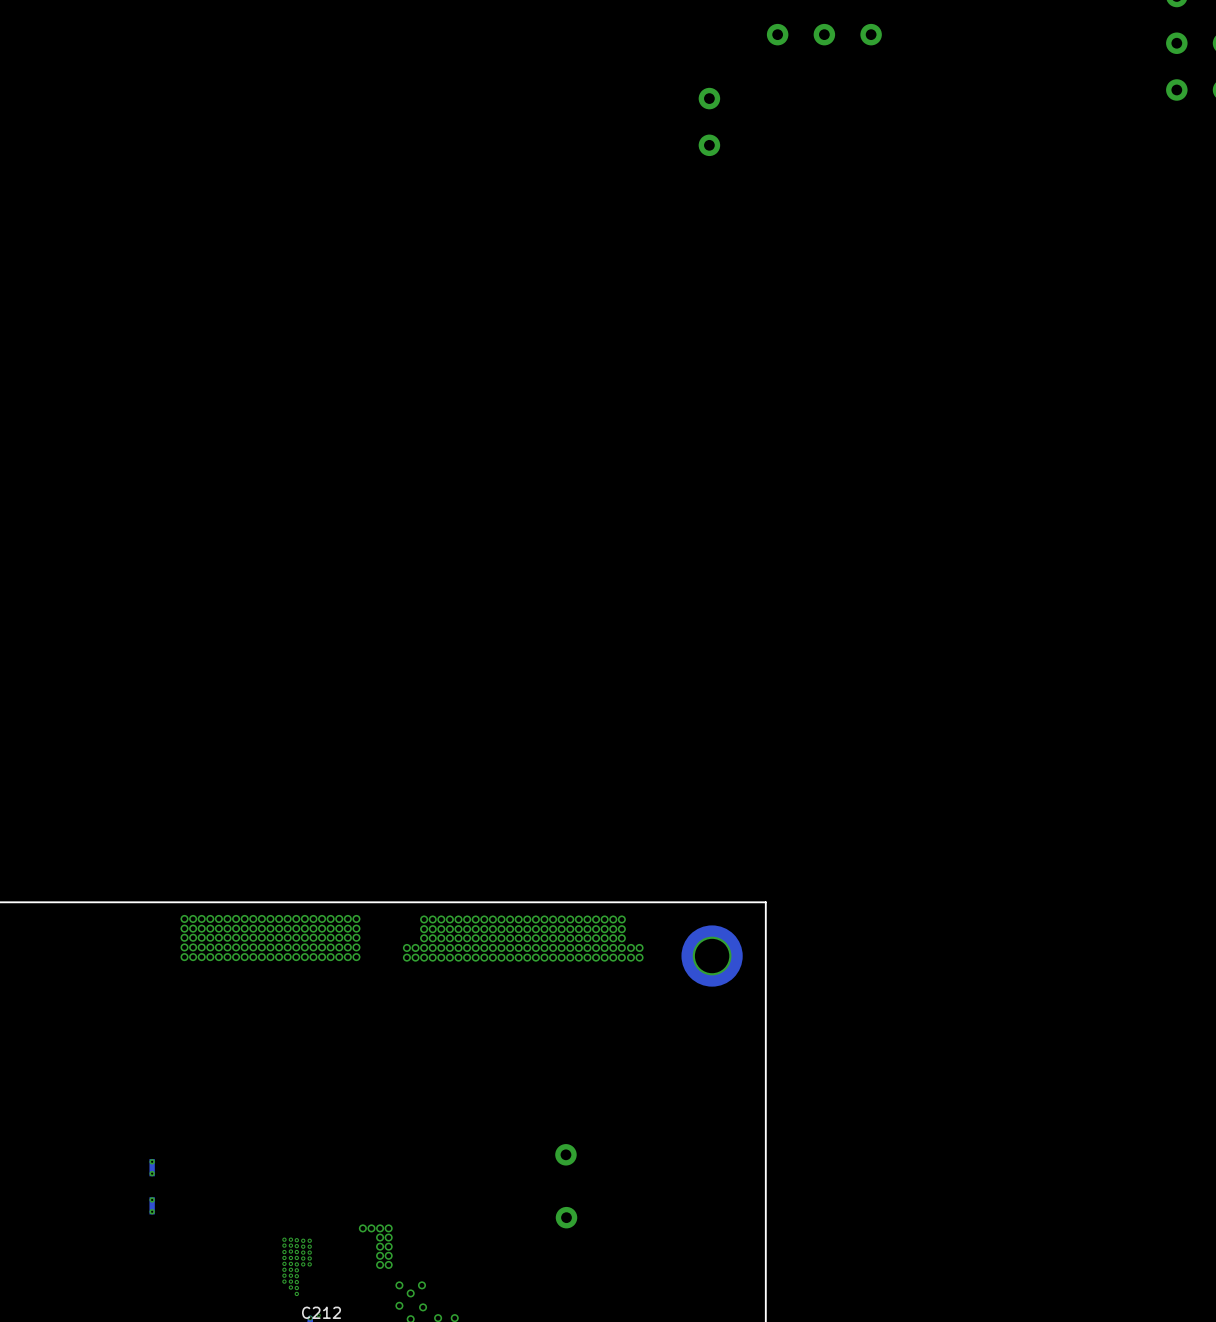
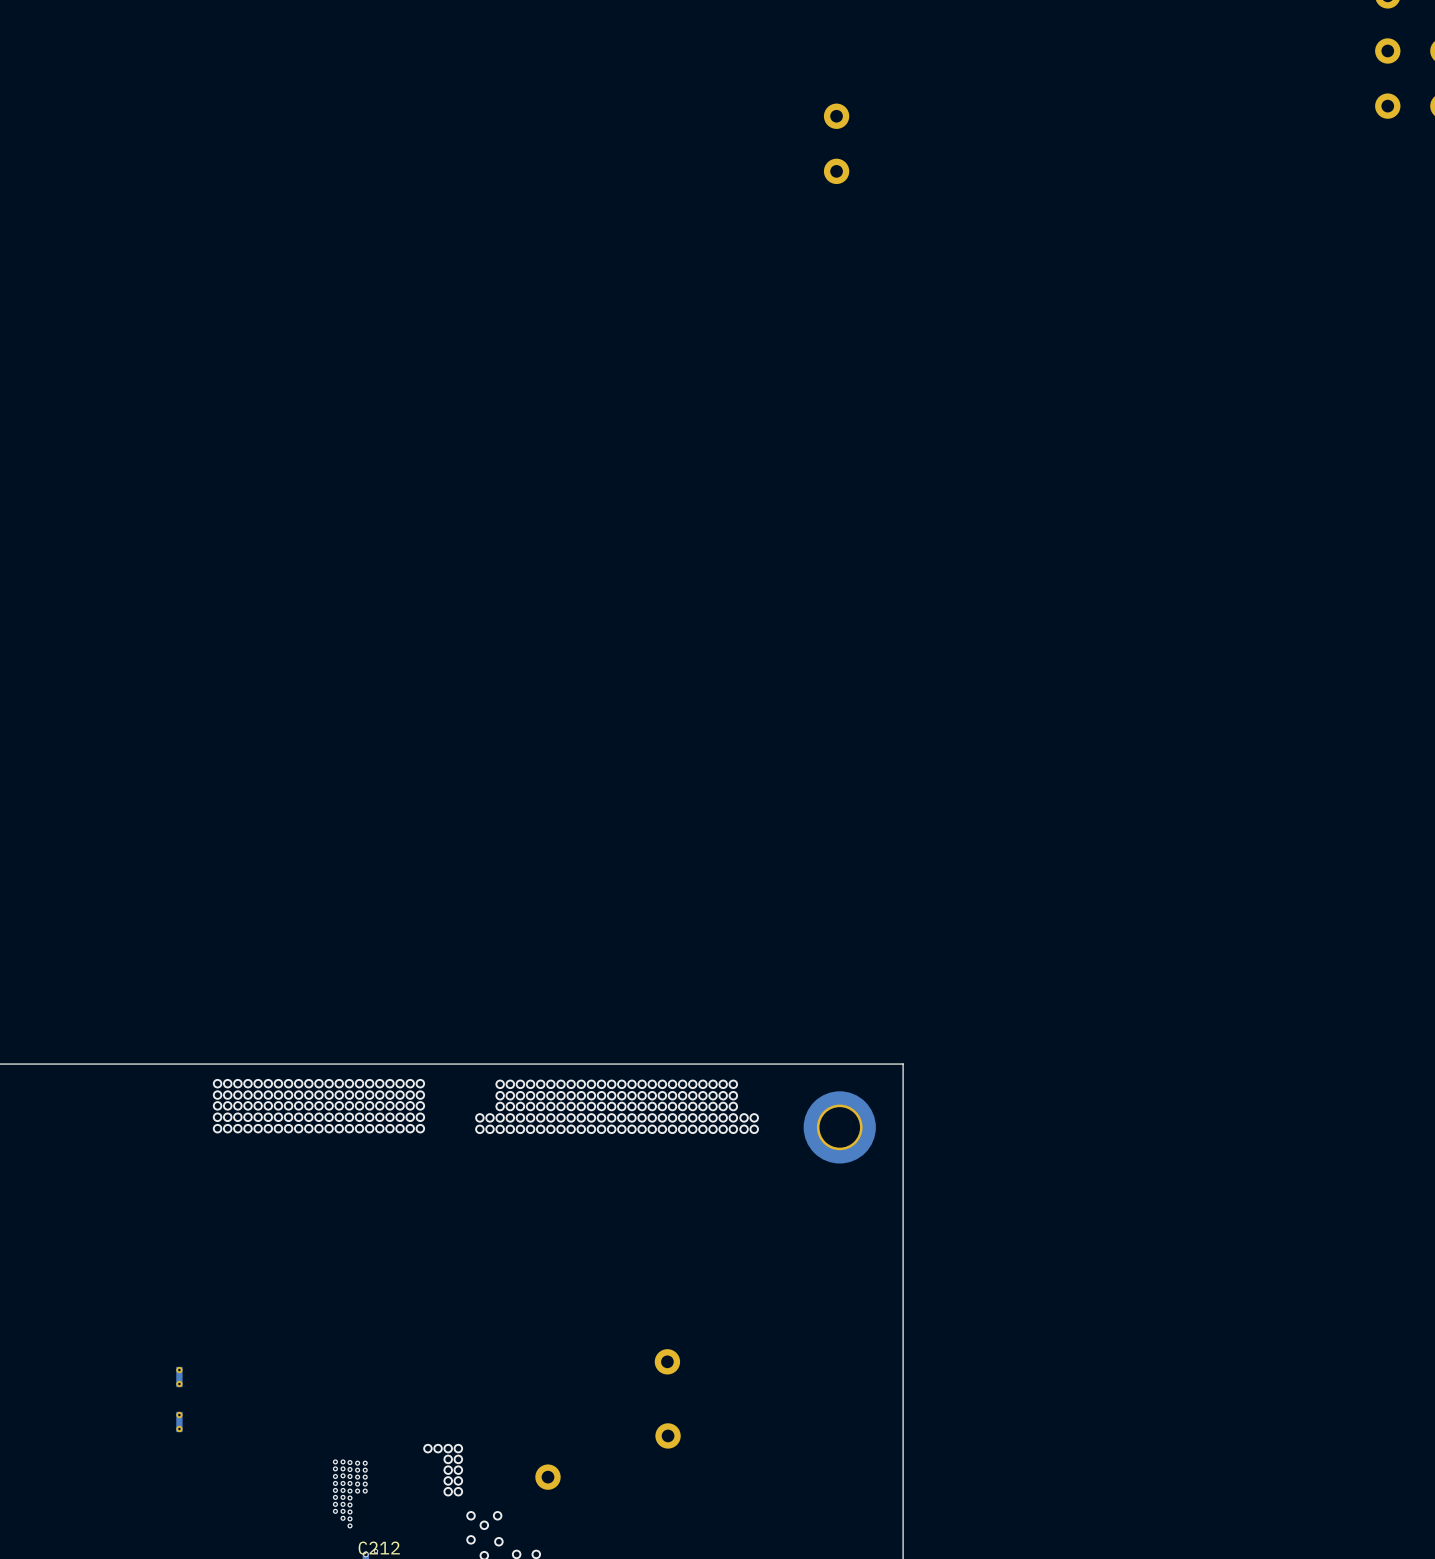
part: (777, 34) -> none
part: (824, 34) -> none
part: (871, 34) -> none
part: none -> (547, 1477)

